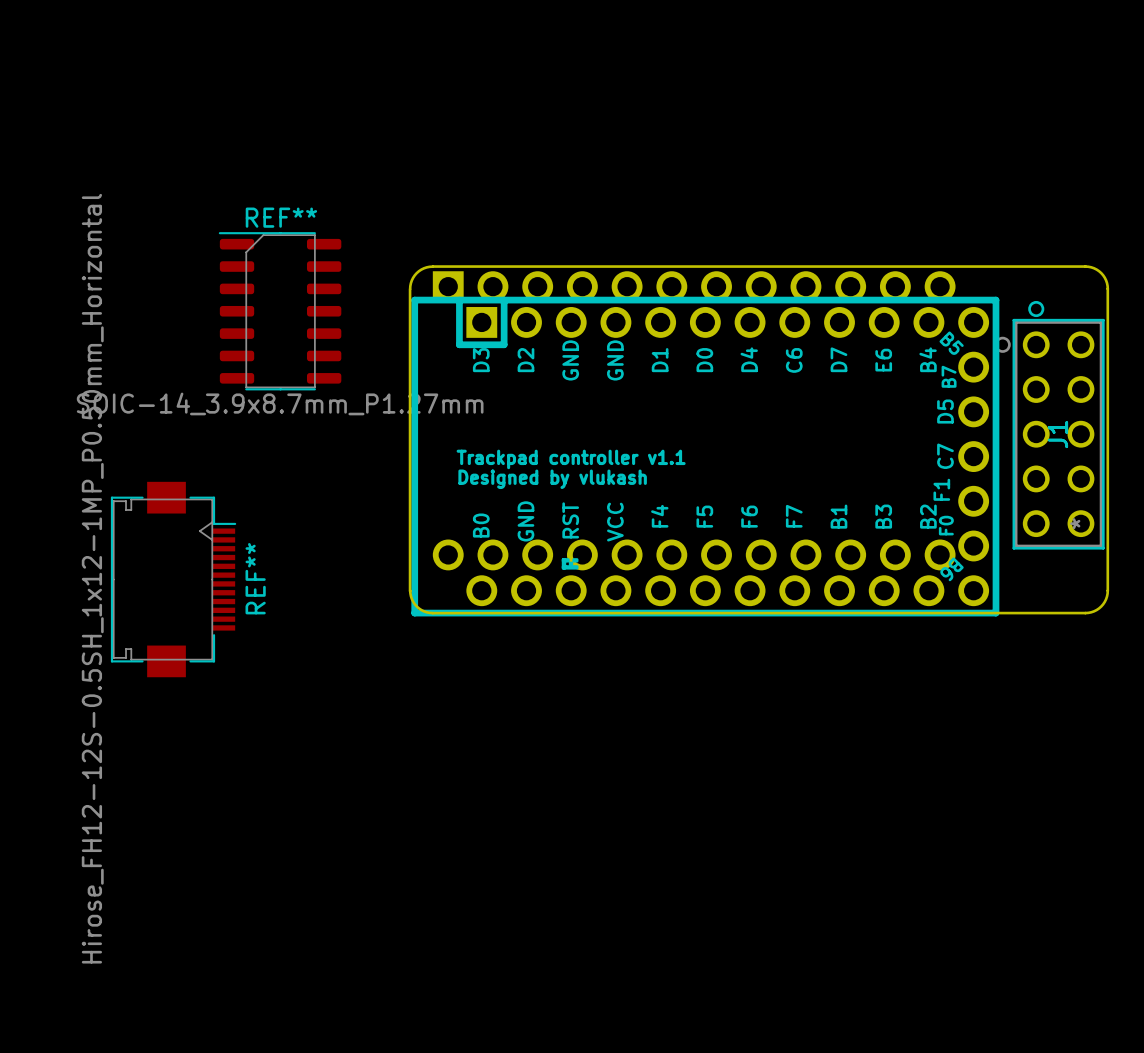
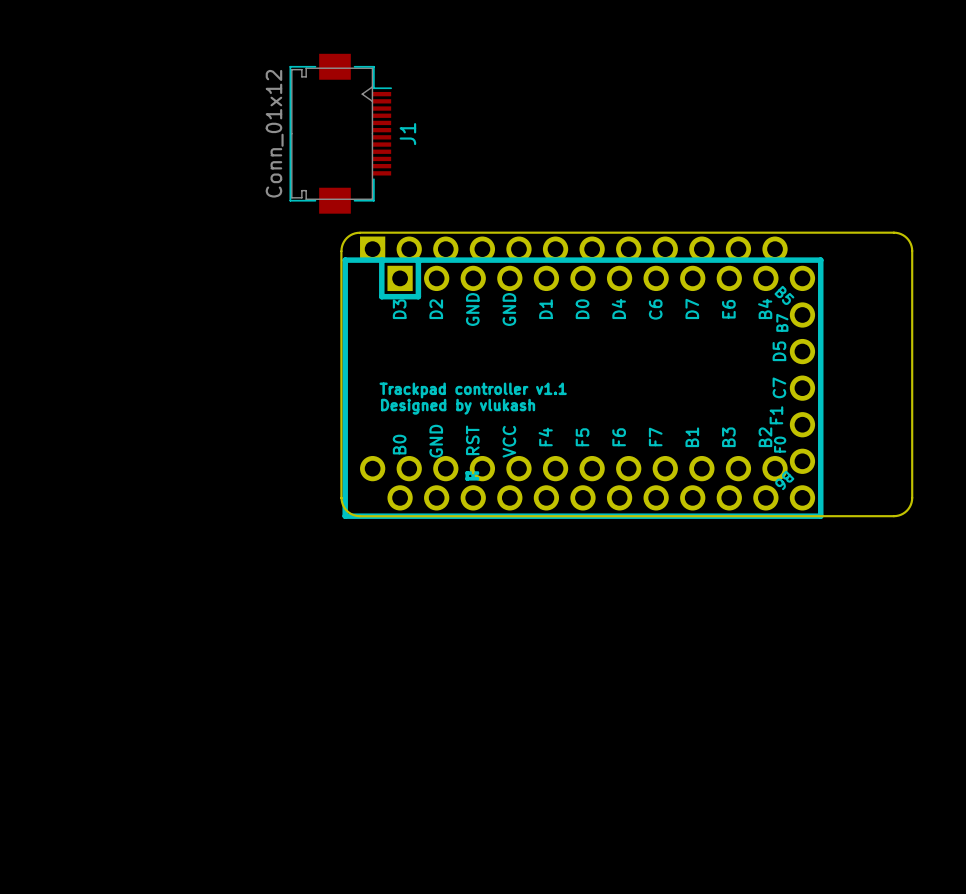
J1 footprint: [994, 300, 1105, 550] -> [289, 53, 393, 214]
REF**: SOIC-14_3.9x8.7mm_P1.27mm (280, 311) -> none
J1 name position: J1 (1057, 434) -> J1 (407, 134)
J1 value: J1 (1057, 434) -> Conn_01x12 (274, 133)
REF**: Hirose_FH12-12S-0.5SH_1x12-1MP_P0.50mm_Horizontal (173, 579) -> none

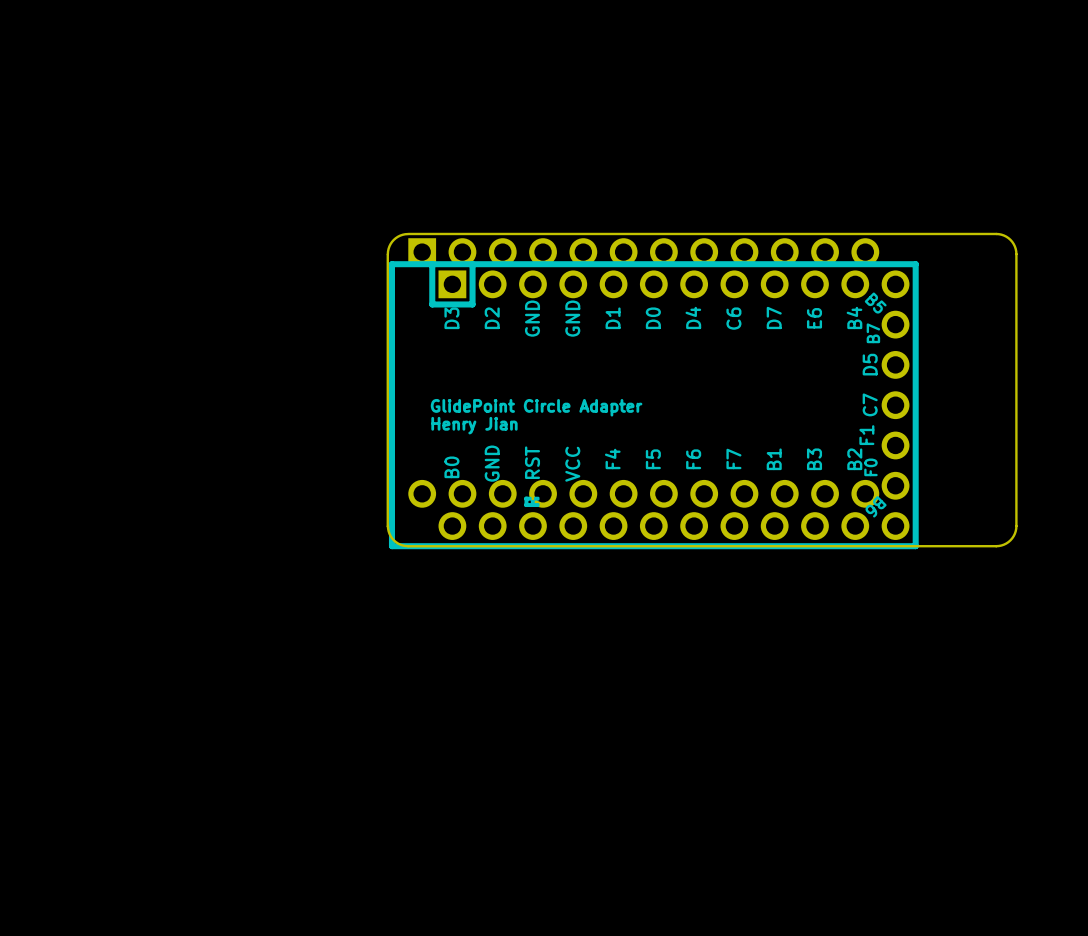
J1: Conn_01x12 (340, 133) -> none
text: Trackpad controller v1.1 (473, 390) -> GlidePoint Circle Adapter (536, 407)
text: Designed by vlukash (458, 406) -> Henry Jian (474, 425)

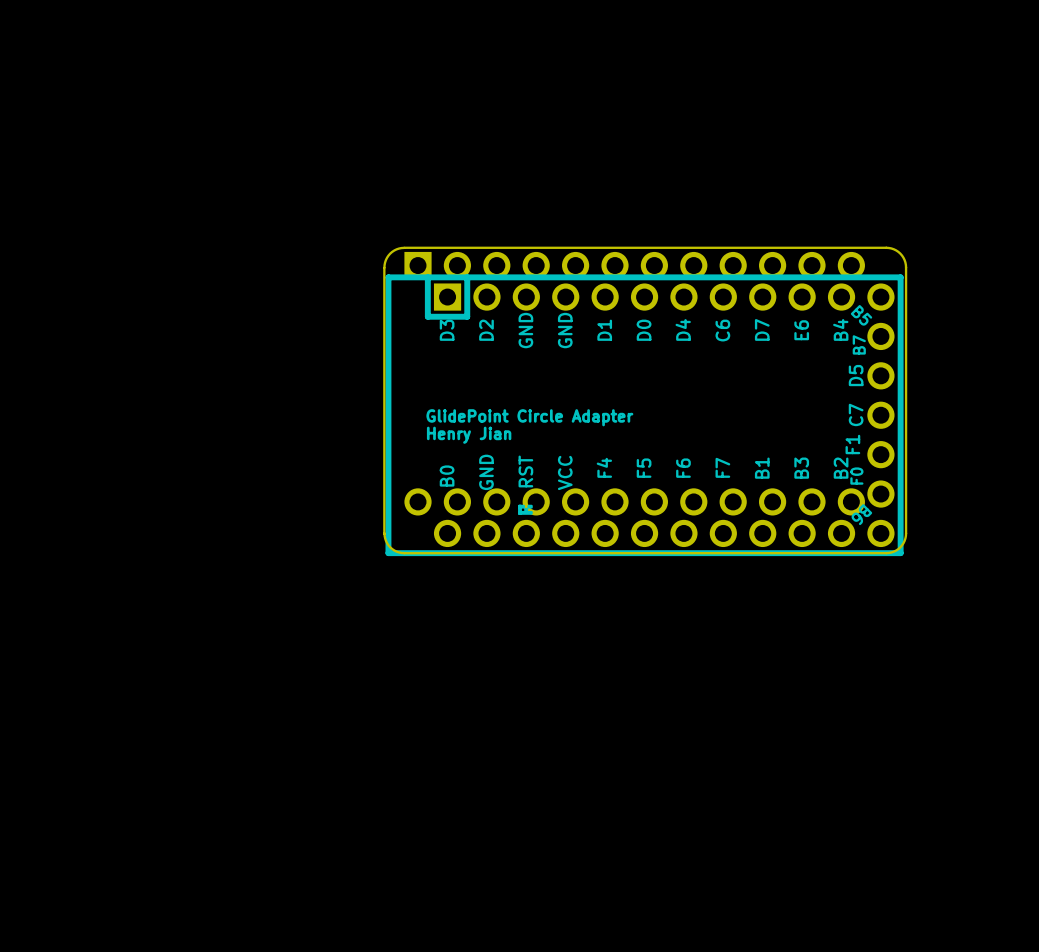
board edge: (901, 233) (998, 234) (1008, 238) (1014, 246) (1016, 526) (1013, 536) (1006, 543) (996, 546) (408, 546) -> (886, 247) (900, 253) (906, 267) (906, 533) (903, 543) (896, 550) (886, 553) (404, 553)

